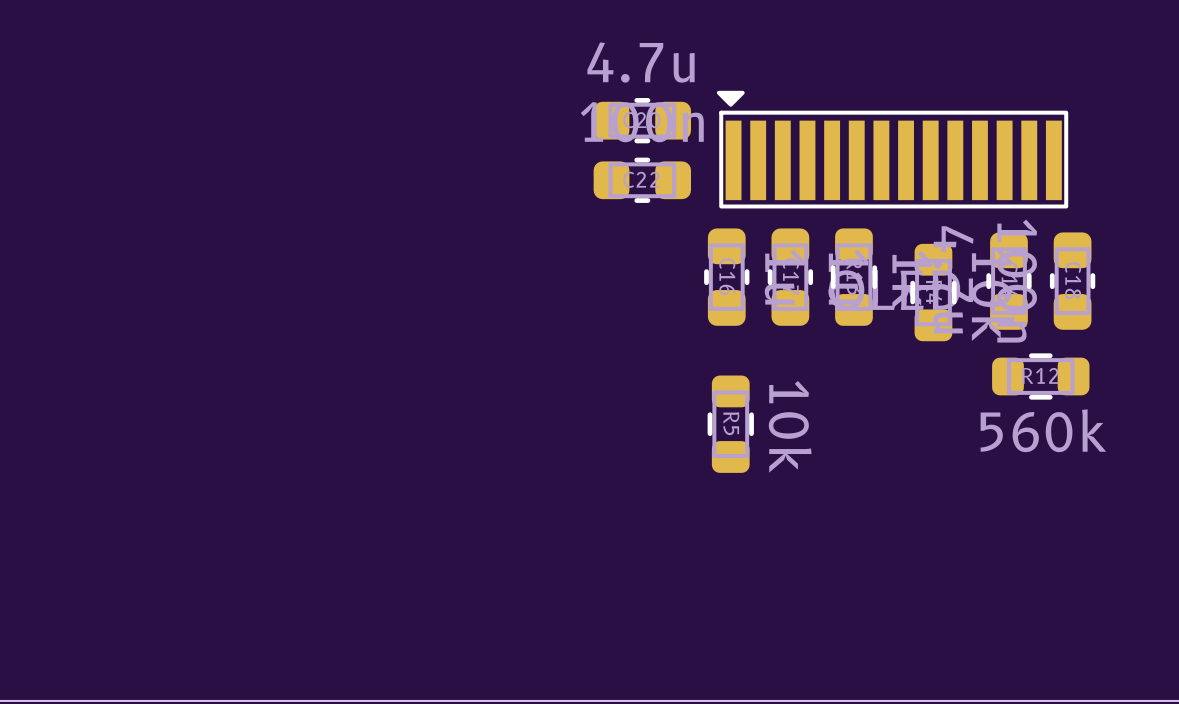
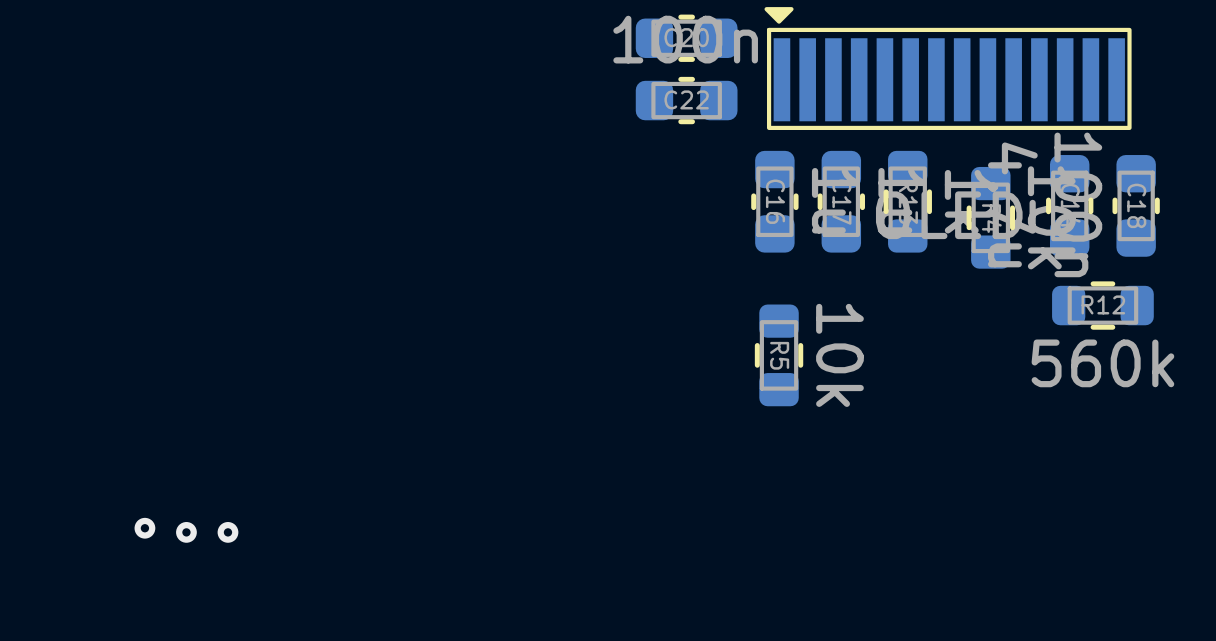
via: none -> (144, 528)
via: none -> (186, 532)
via: none -> (227, 532)

